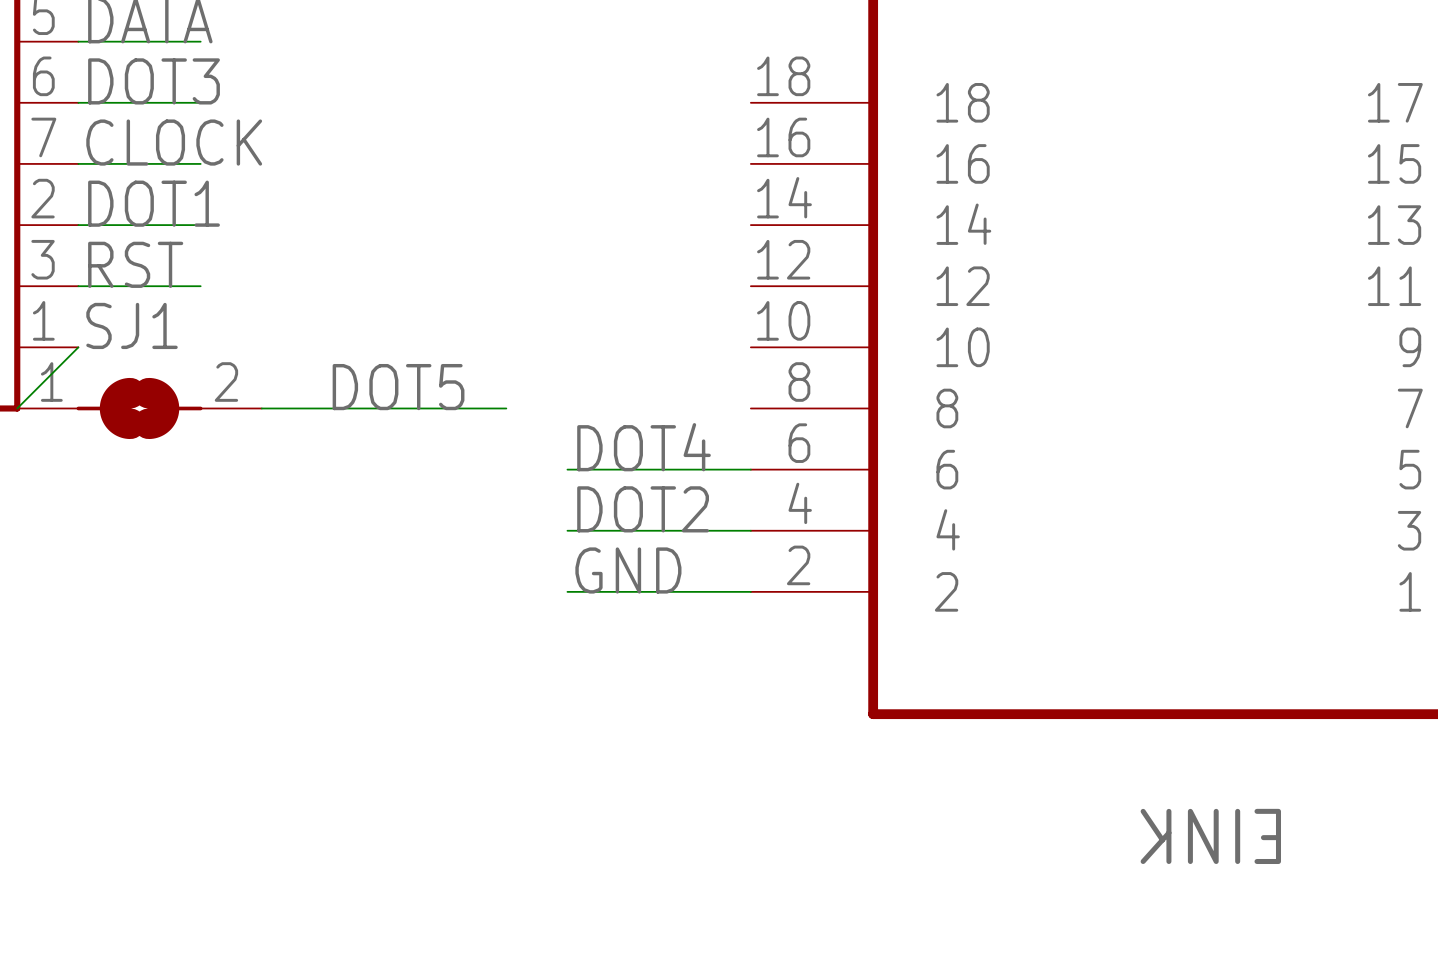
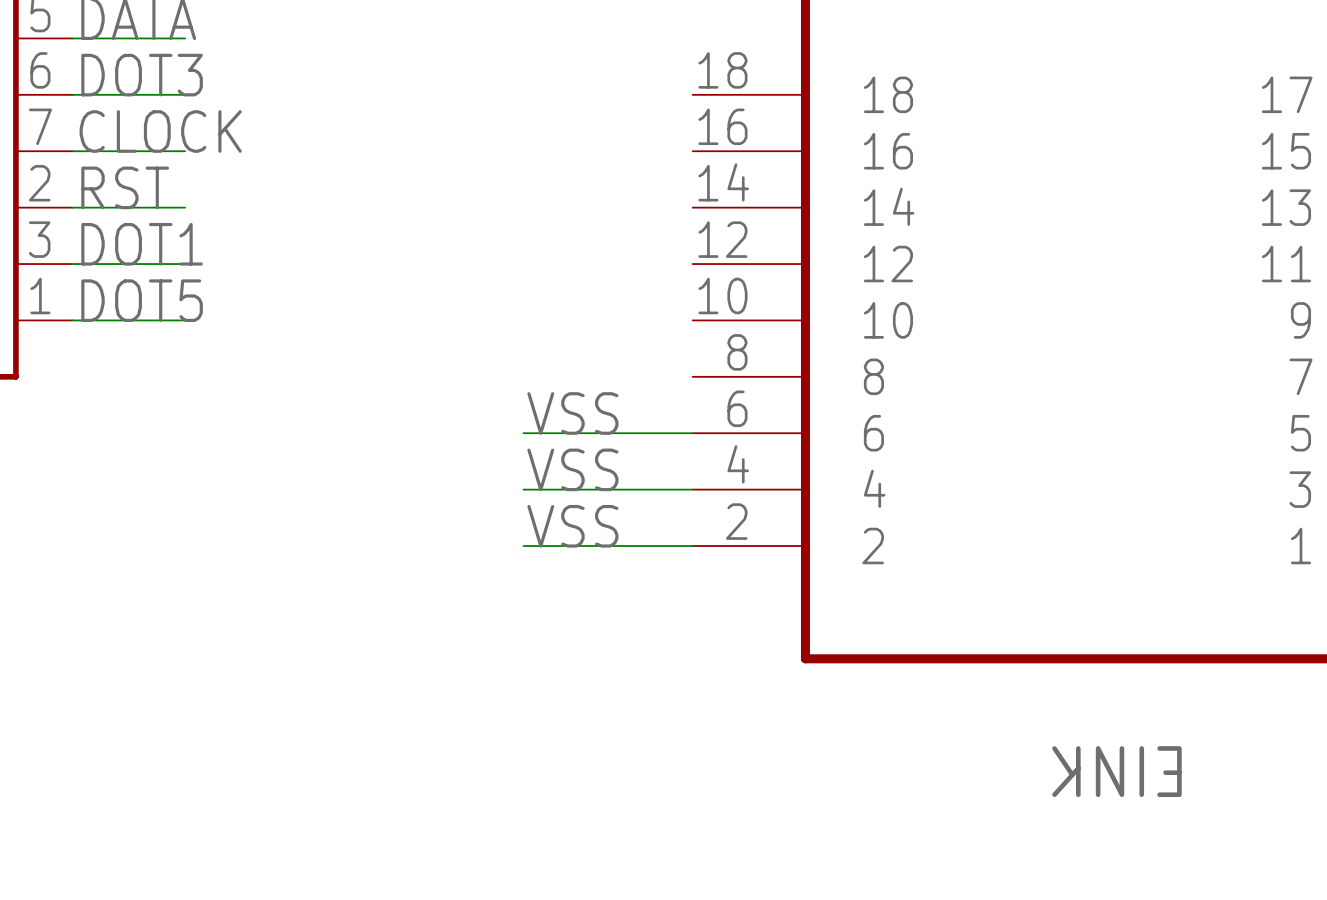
label: DOT1 (154, 203) -> RST (125, 187)
label: RST (135, 264) -> DOT1 (142, 244)
wire: (78, 347) (17, 408) -> (72, 320) (185, 320)
label position: DOT5 (398, 387) -> DOT5 (142, 300)
SJ1: (139, 408) -> none
wire: (261, 408) (506, 408) -> none
label: DOT4 (644, 447) -> VSS (572, 413)
label: DOT2 (643, 509) -> VSS (572, 469)
label: GND (628, 570) -> VSS (572, 526)

